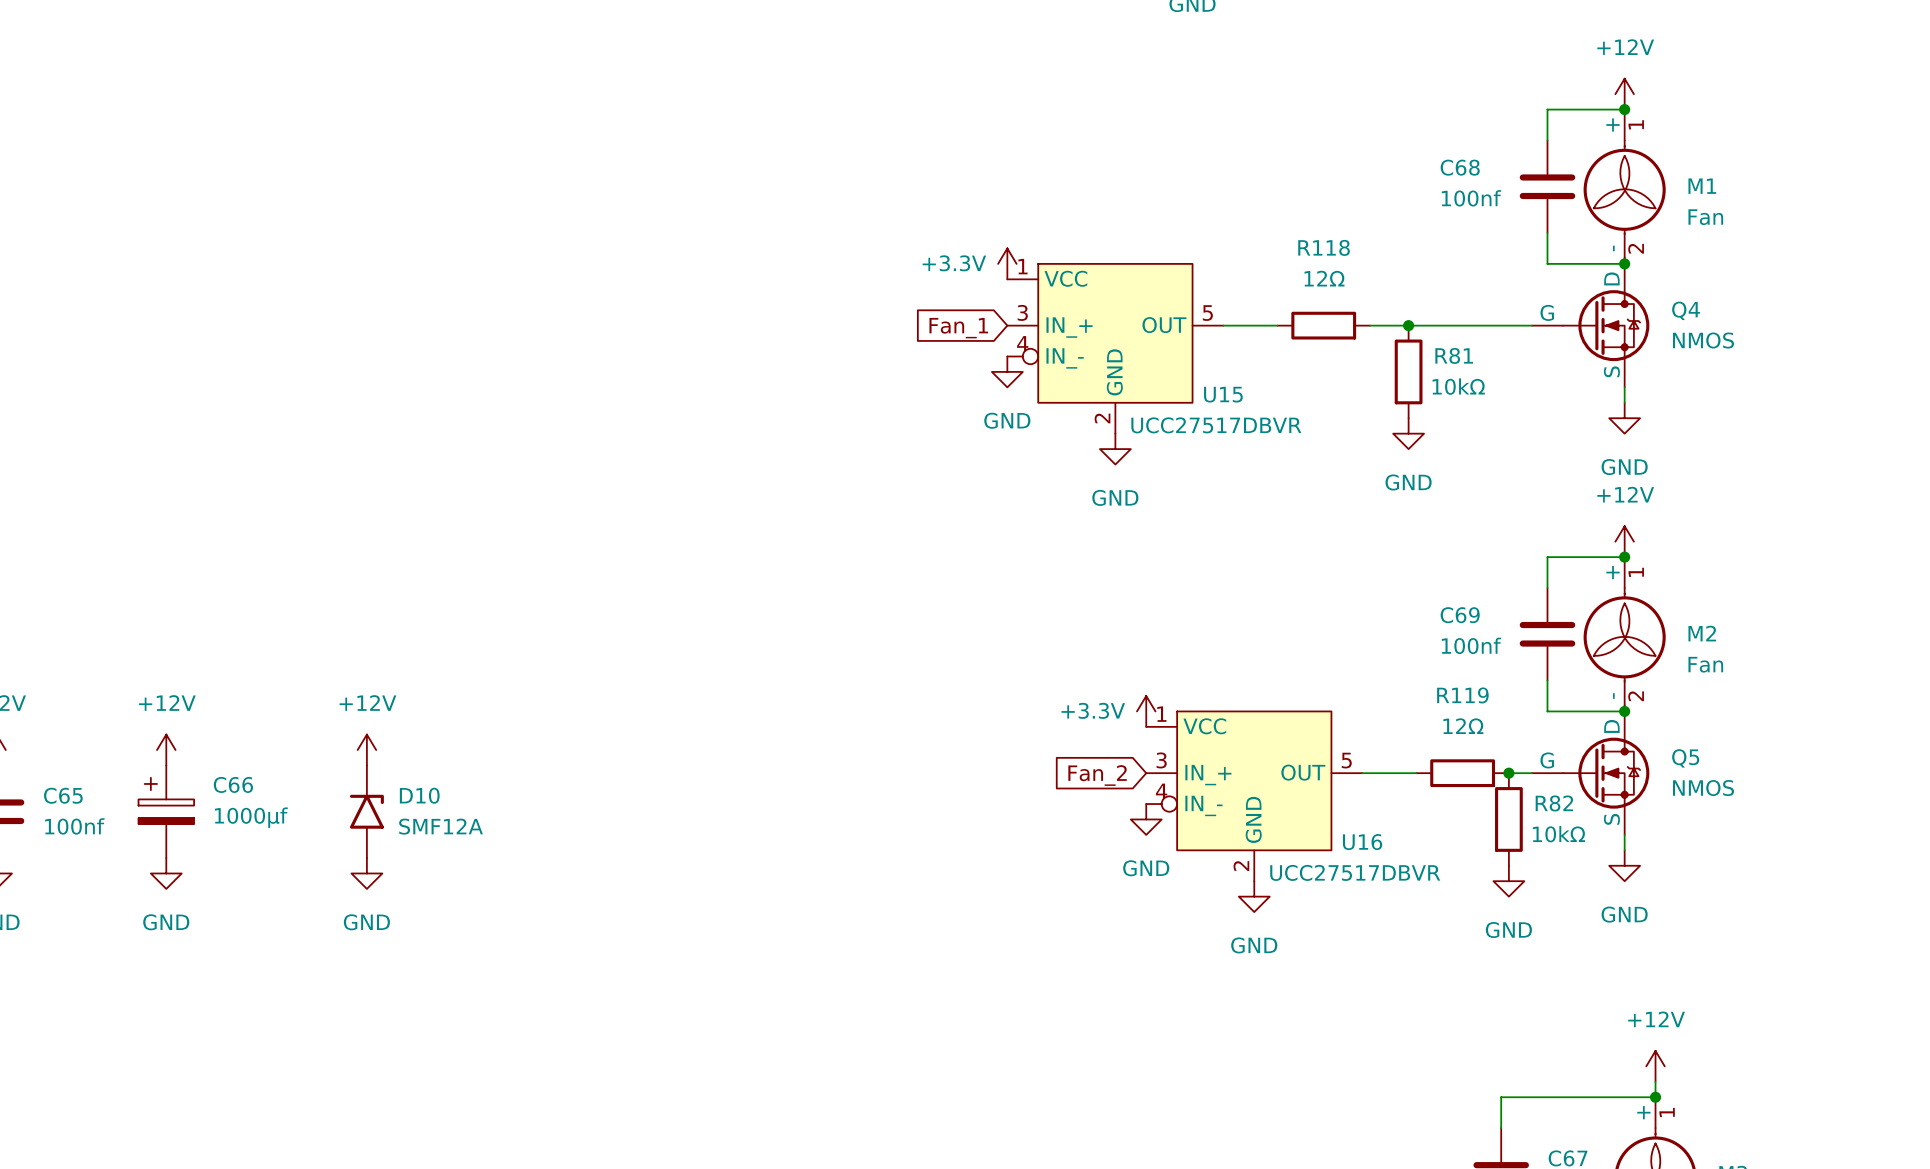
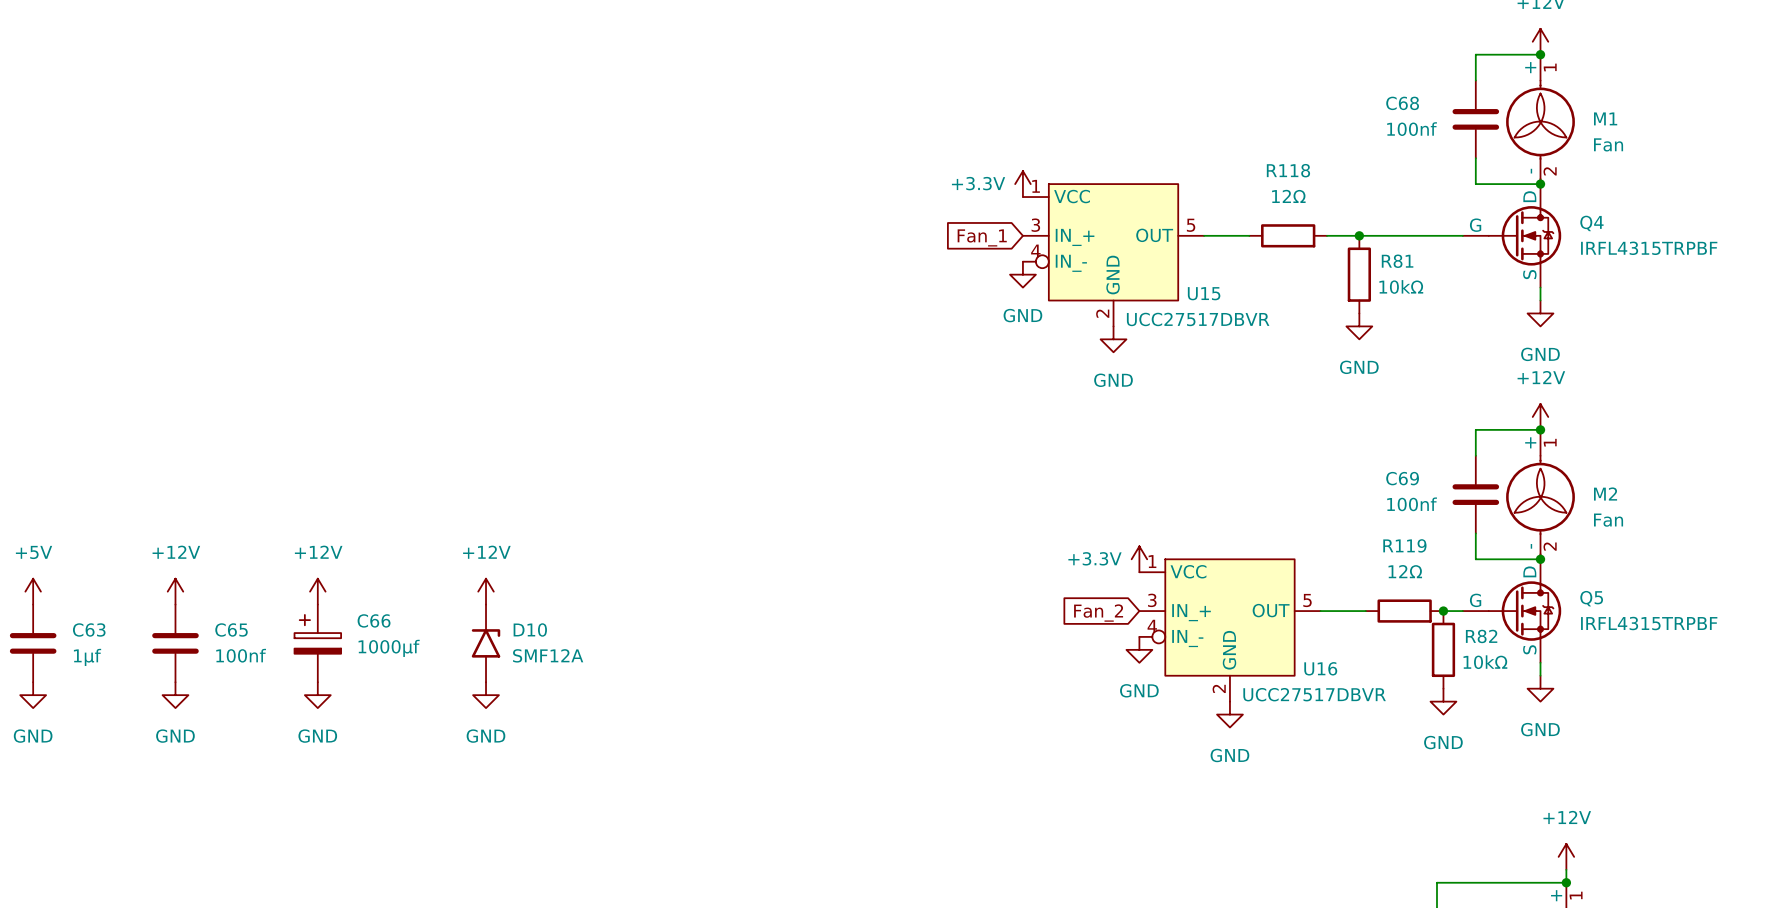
Q4 value: NMOS (1703, 340) -> IRFL4315TRPBF (1649, 248)
Q5 value: NMOS (1703, 788) -> IRFL4315TRPBF (1649, 623)

